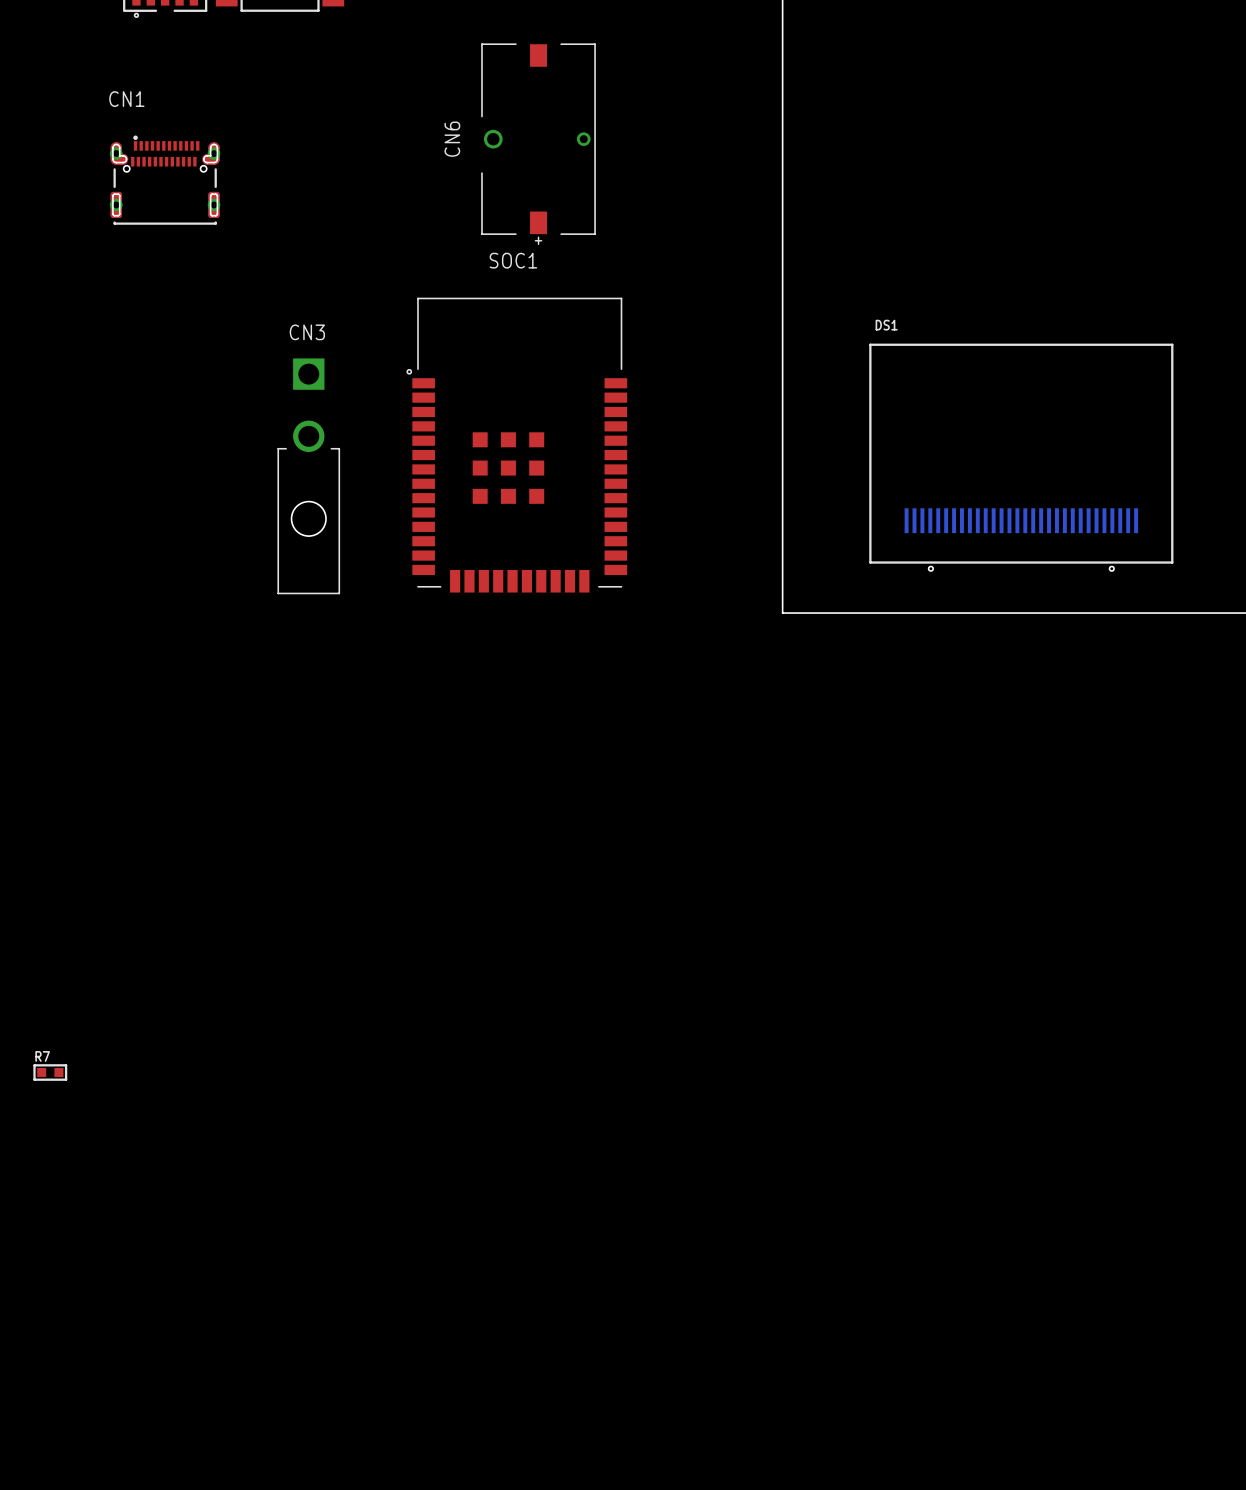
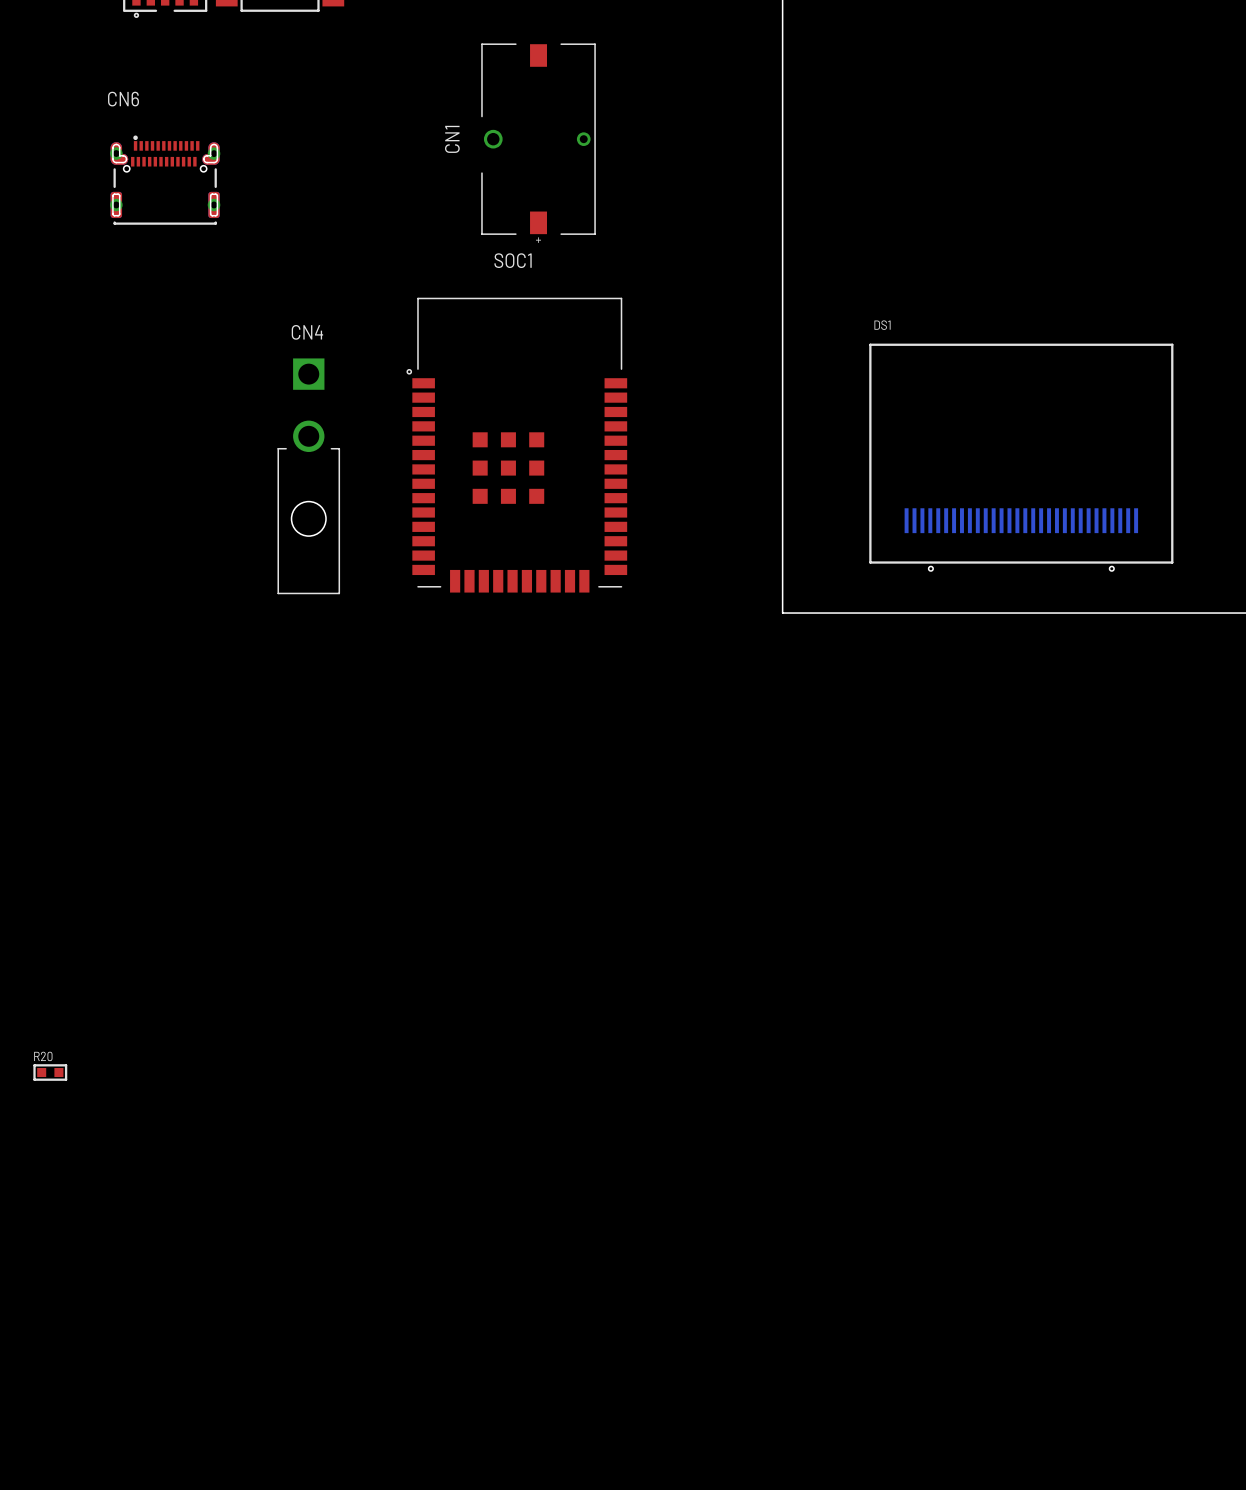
CN1 name: CN1 (126, 99) -> CN6 (123, 99)
CN6 name: CN6 (452, 139) -> CN1 (452, 139)
CN3 name: CN3 (307, 332) -> CN4 (307, 332)
R7 name: R7 (42, 1056) -> R20 (43, 1056)

